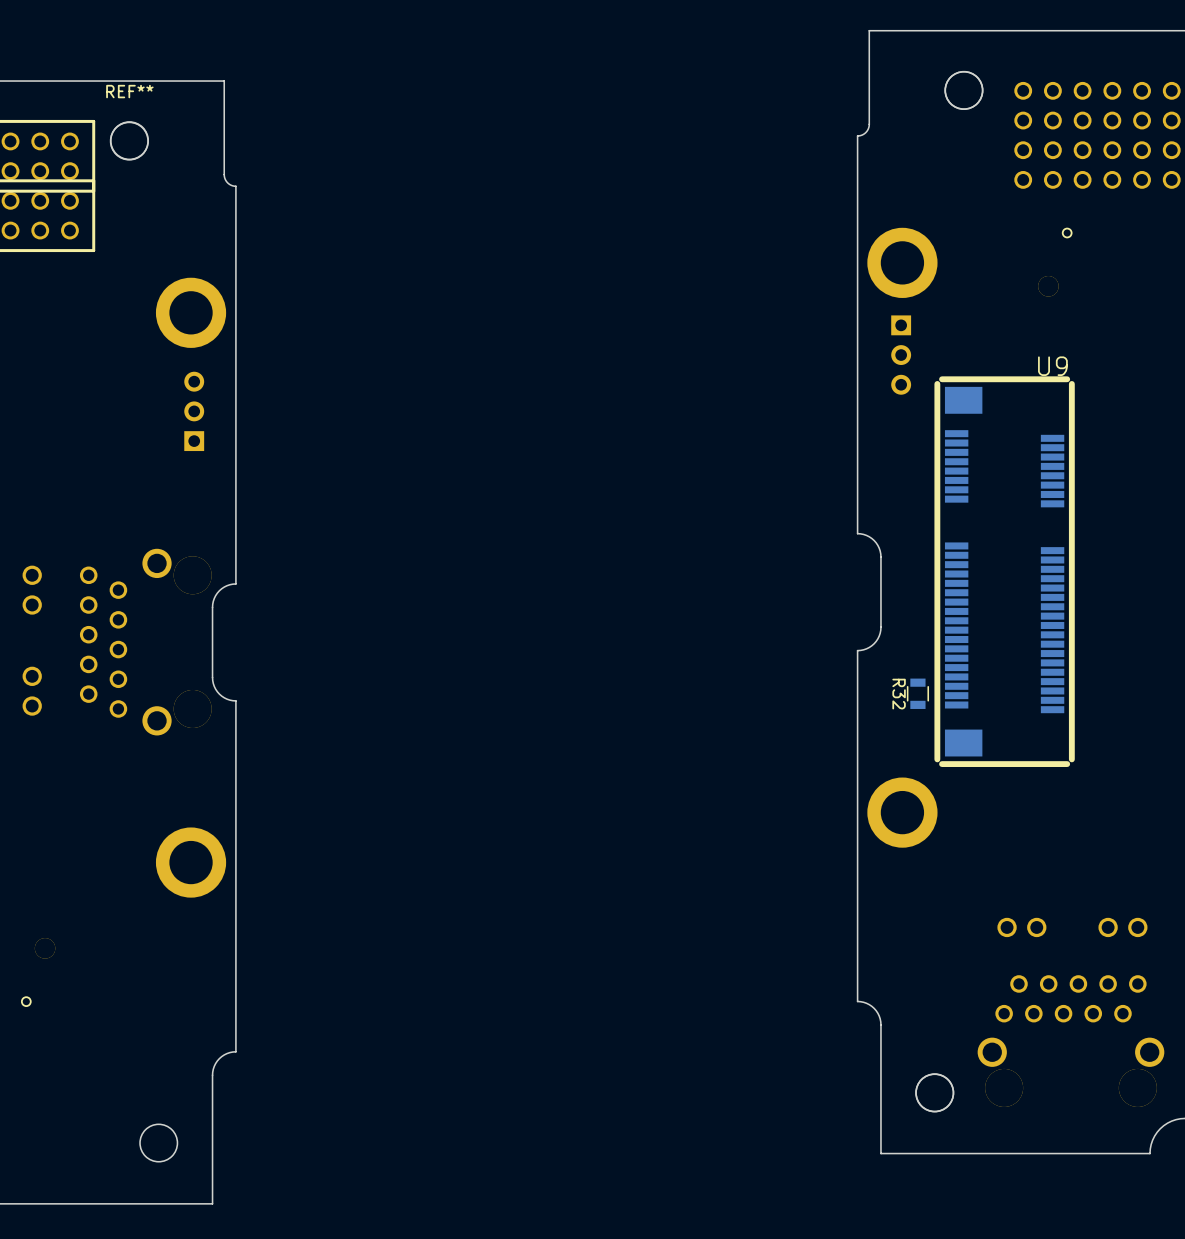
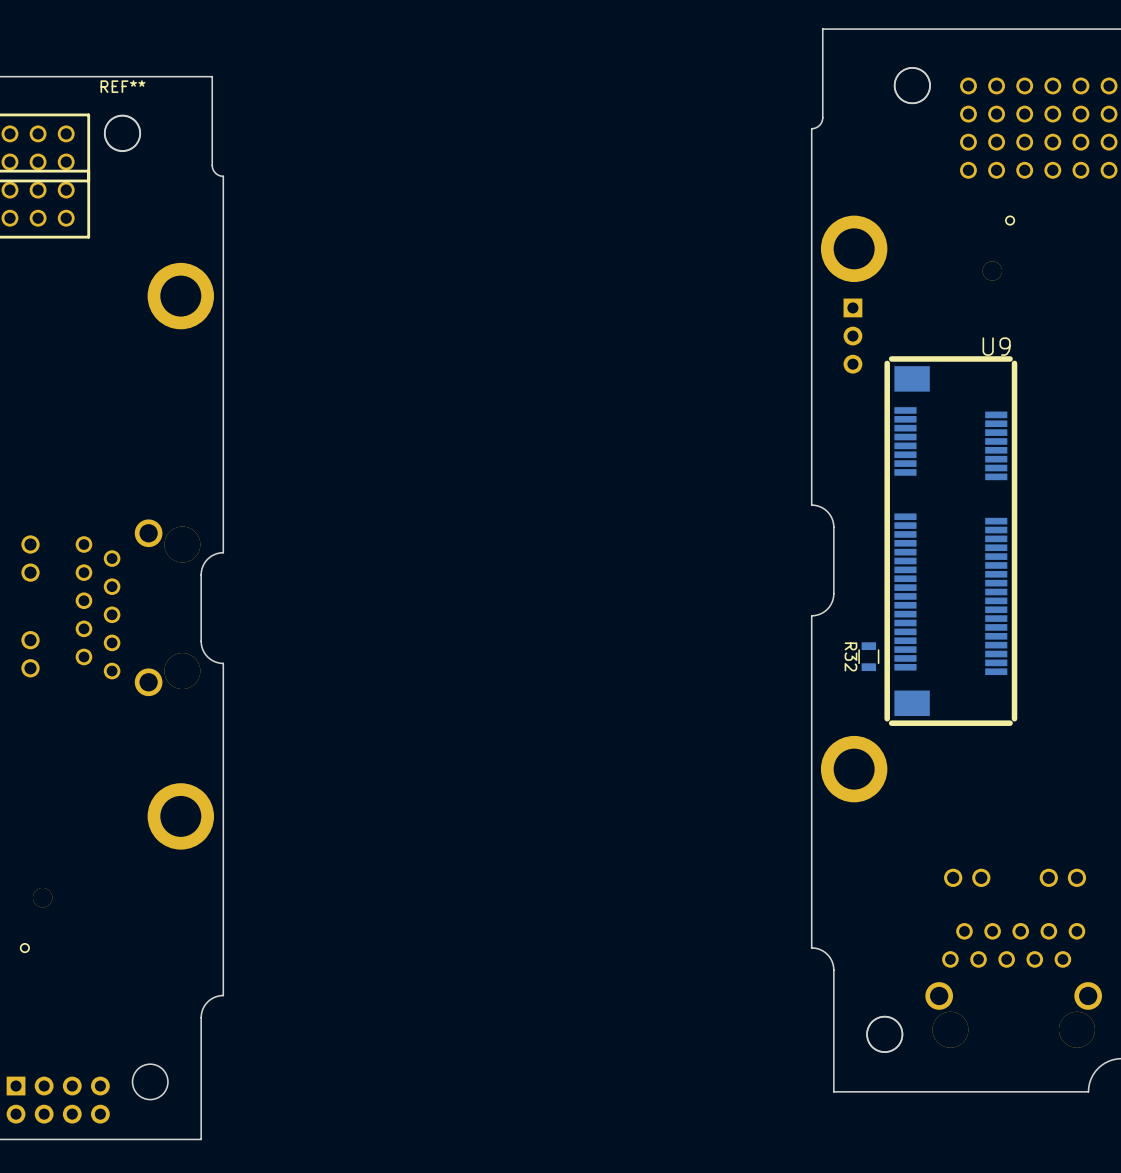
part: (194, 411) -> none
part: none -> (58, 1100)

